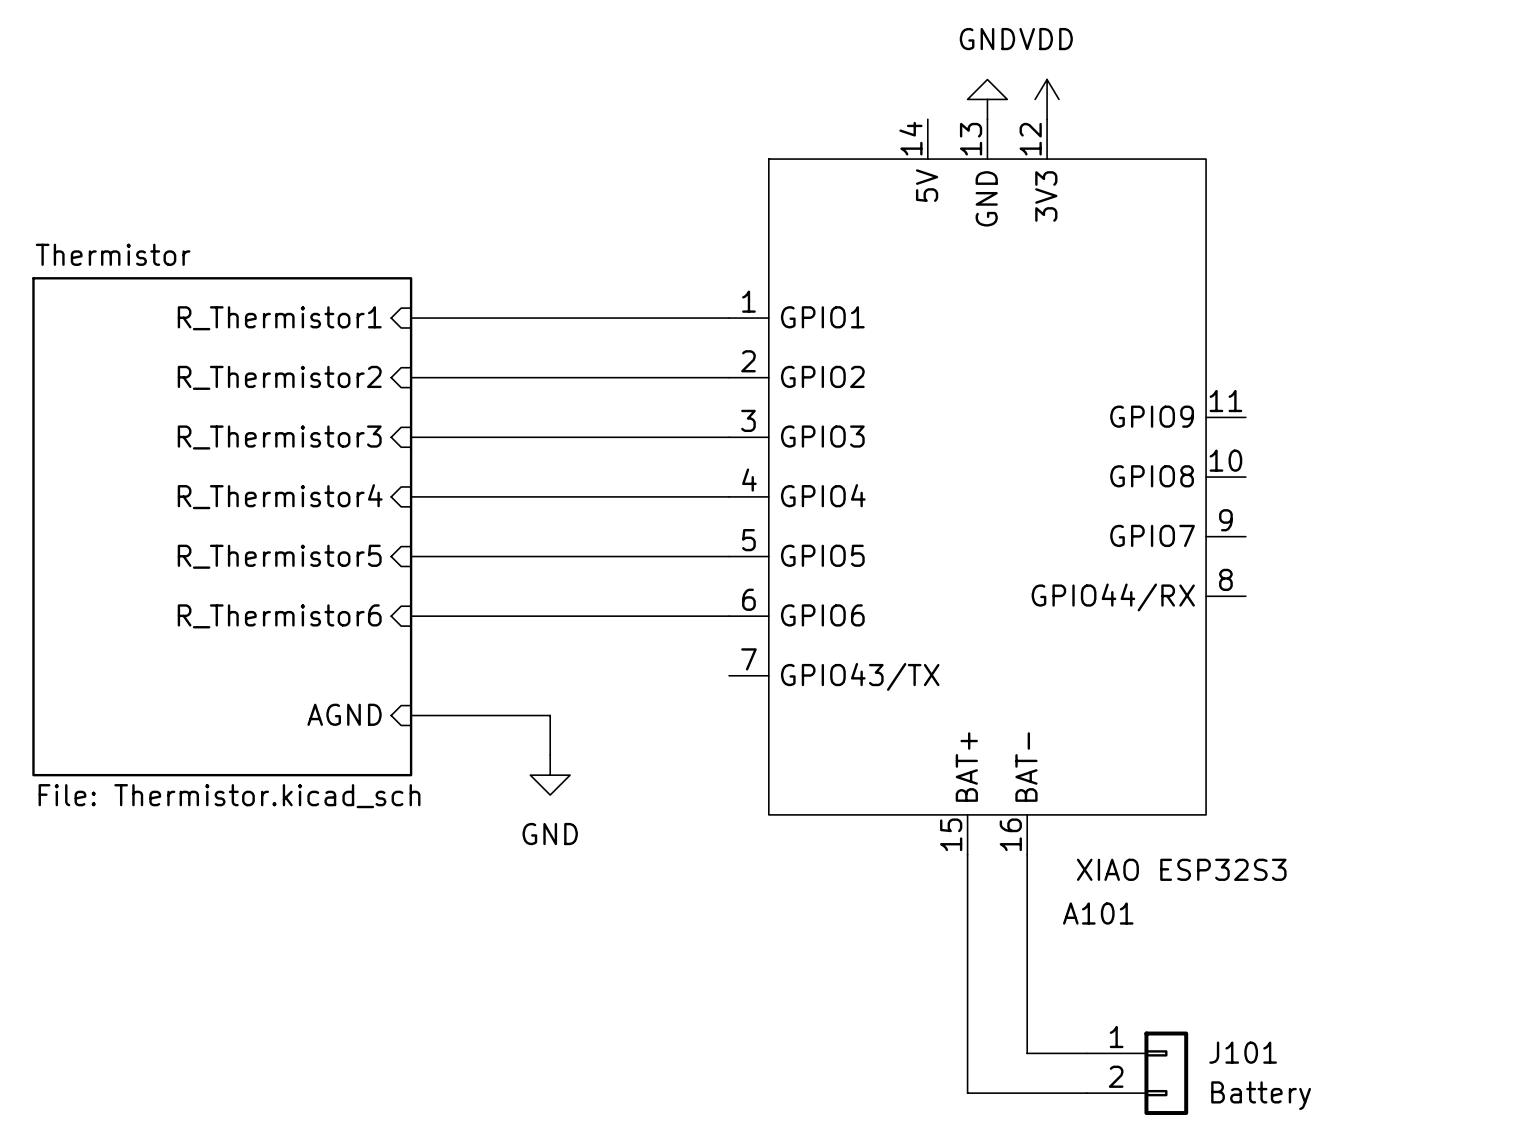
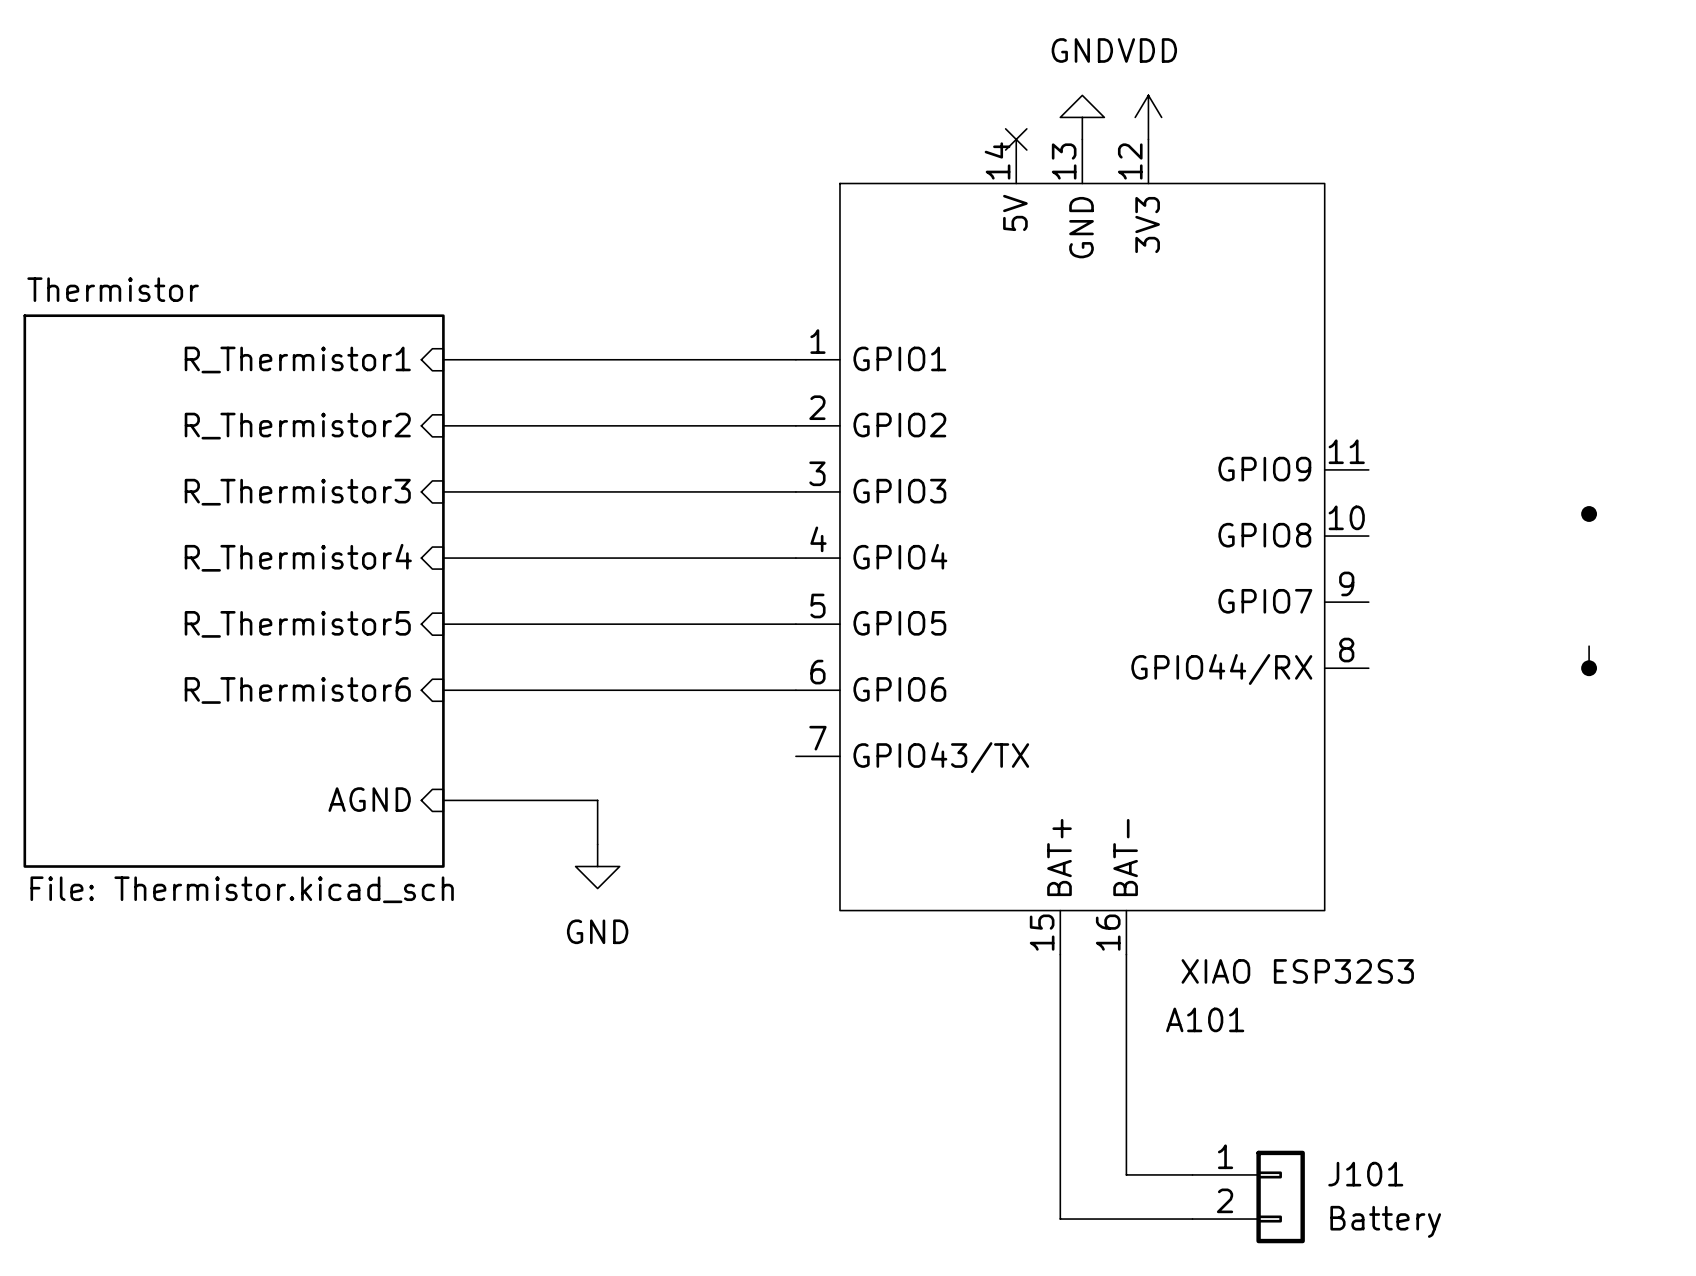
no-connect mark: none -> (1016, 139)
junction: none -> (1589, 513)
wire: none -> (1589, 646) (1589, 668)
junction: none -> (1589, 668)

